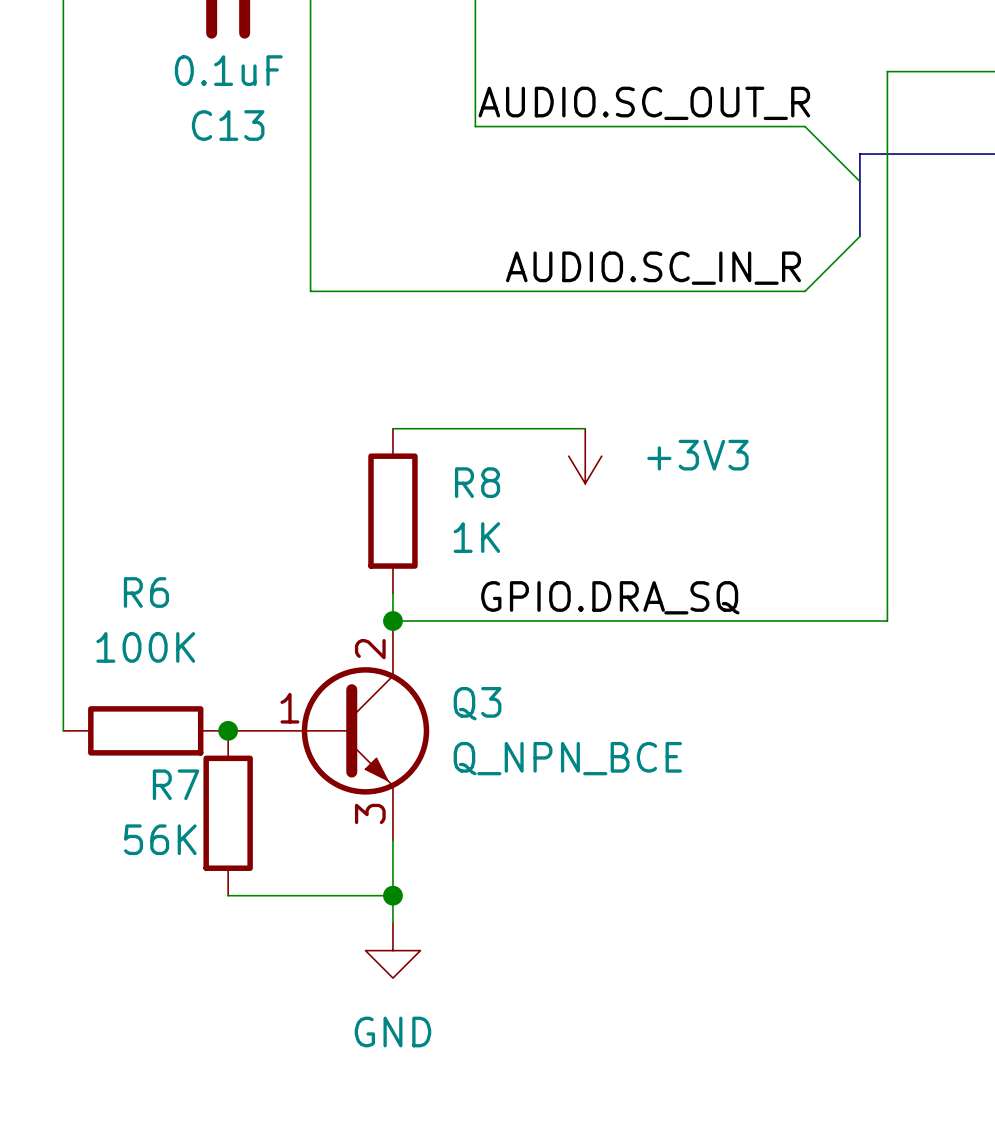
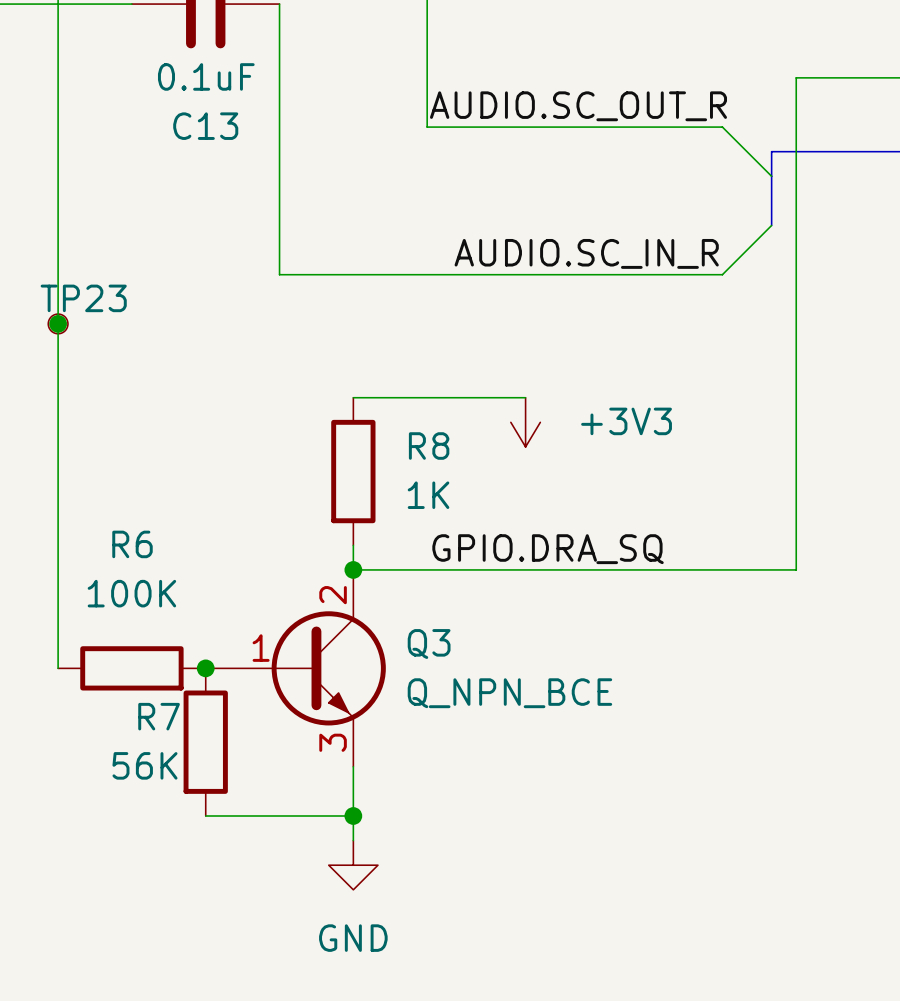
junction: none -> (58, 323)
TP23: none -> (58, 323)

